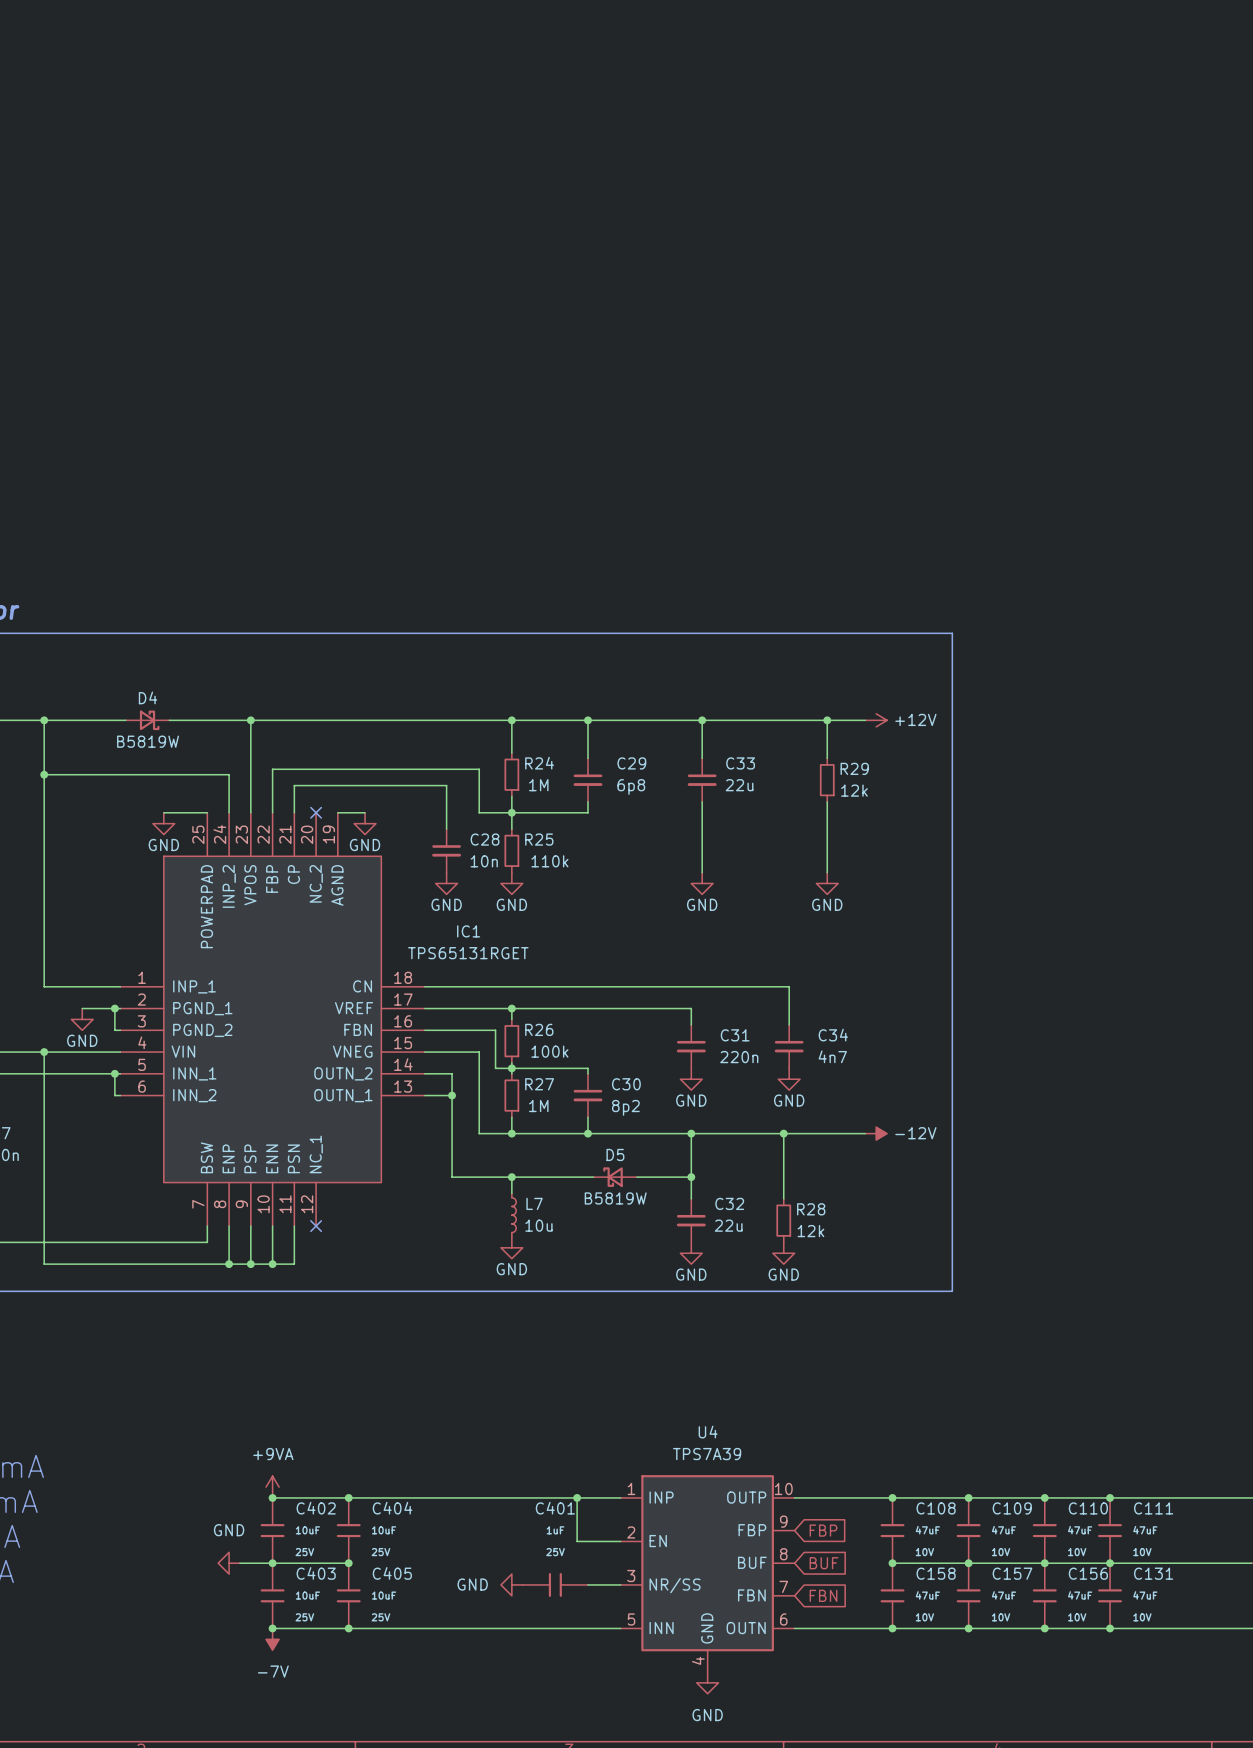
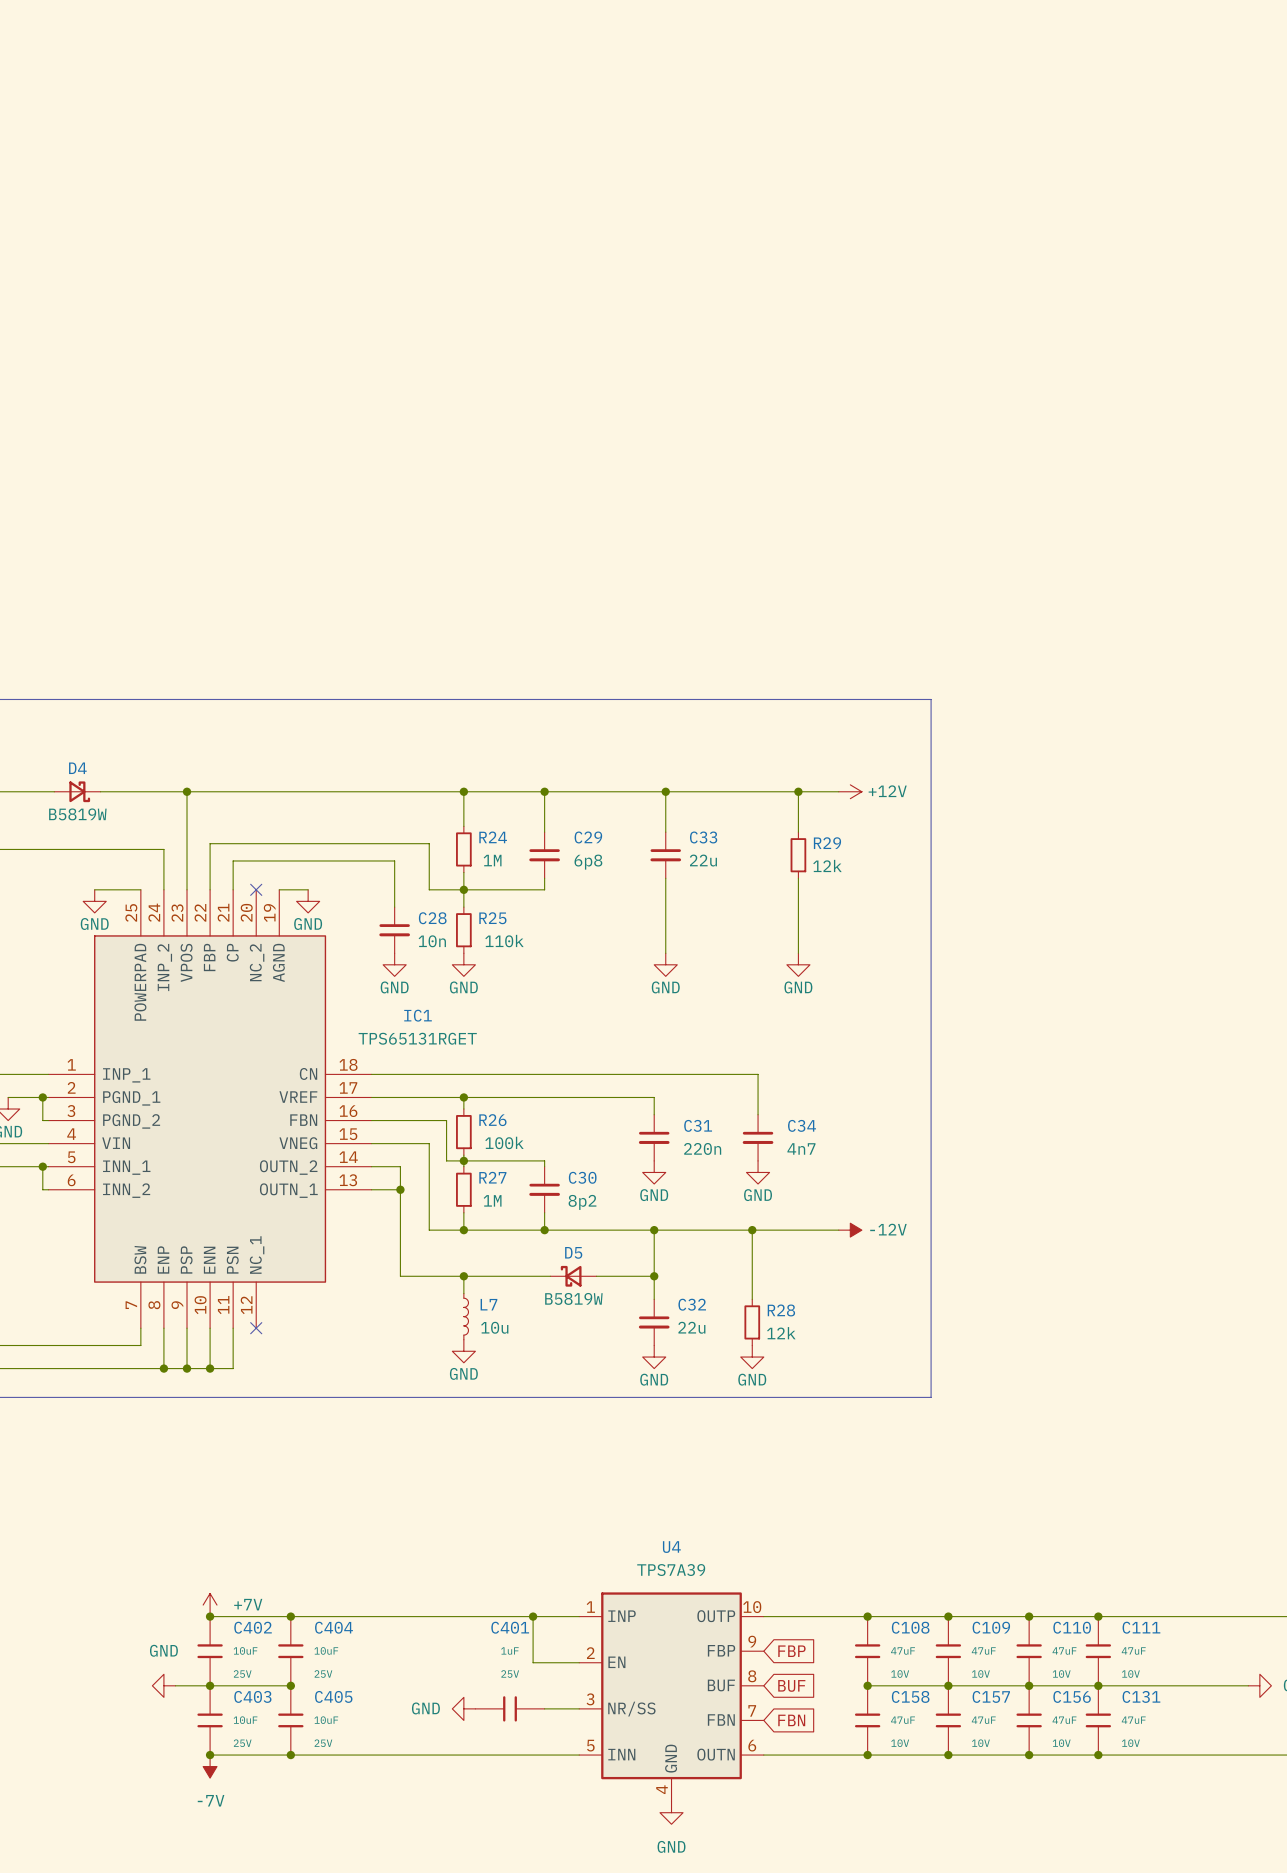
power symbol: +9VA (272, 1487) -> +7V (210, 1605)

